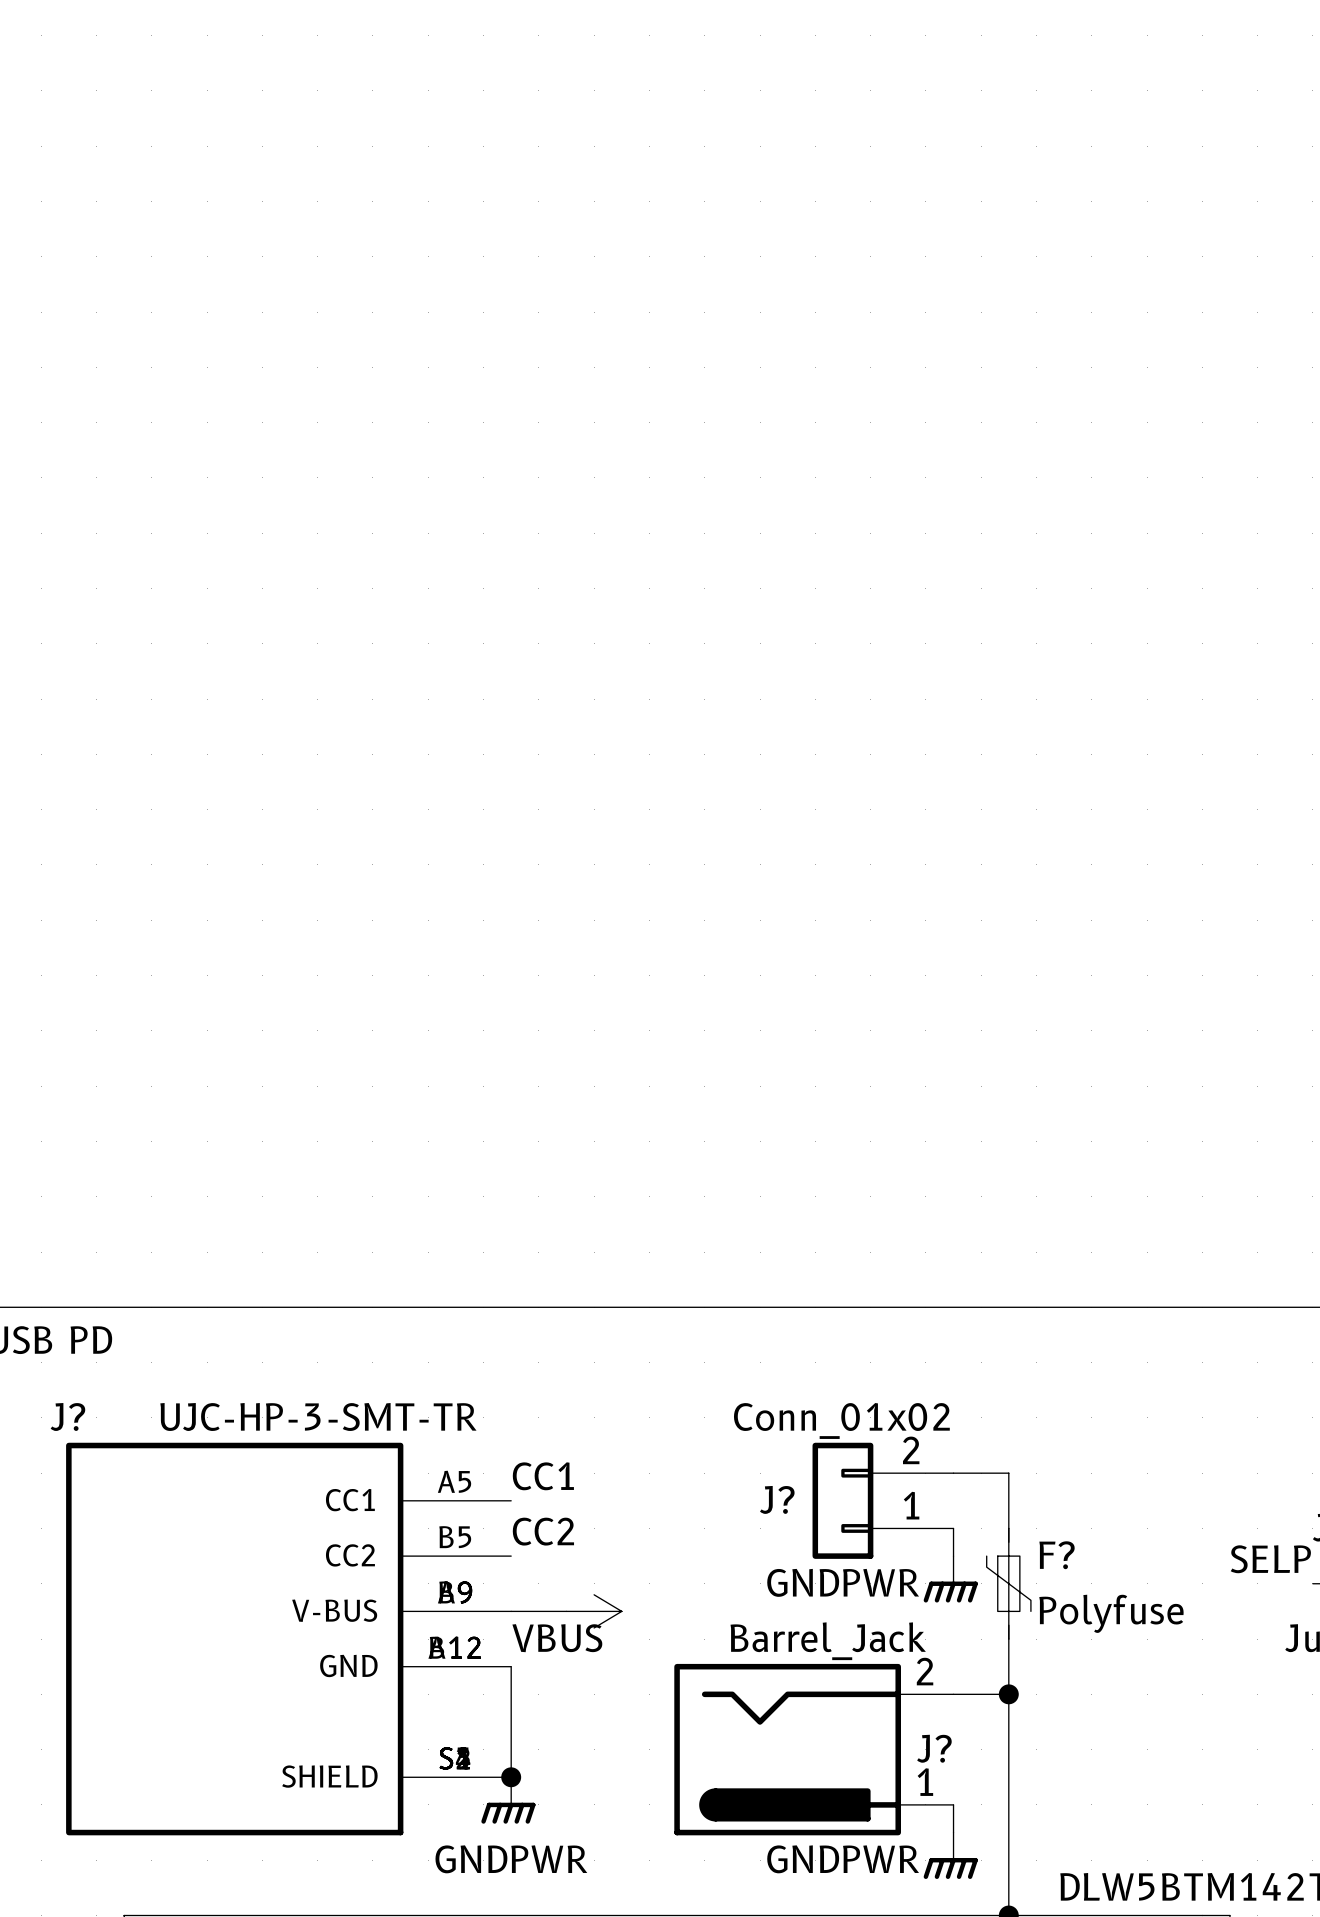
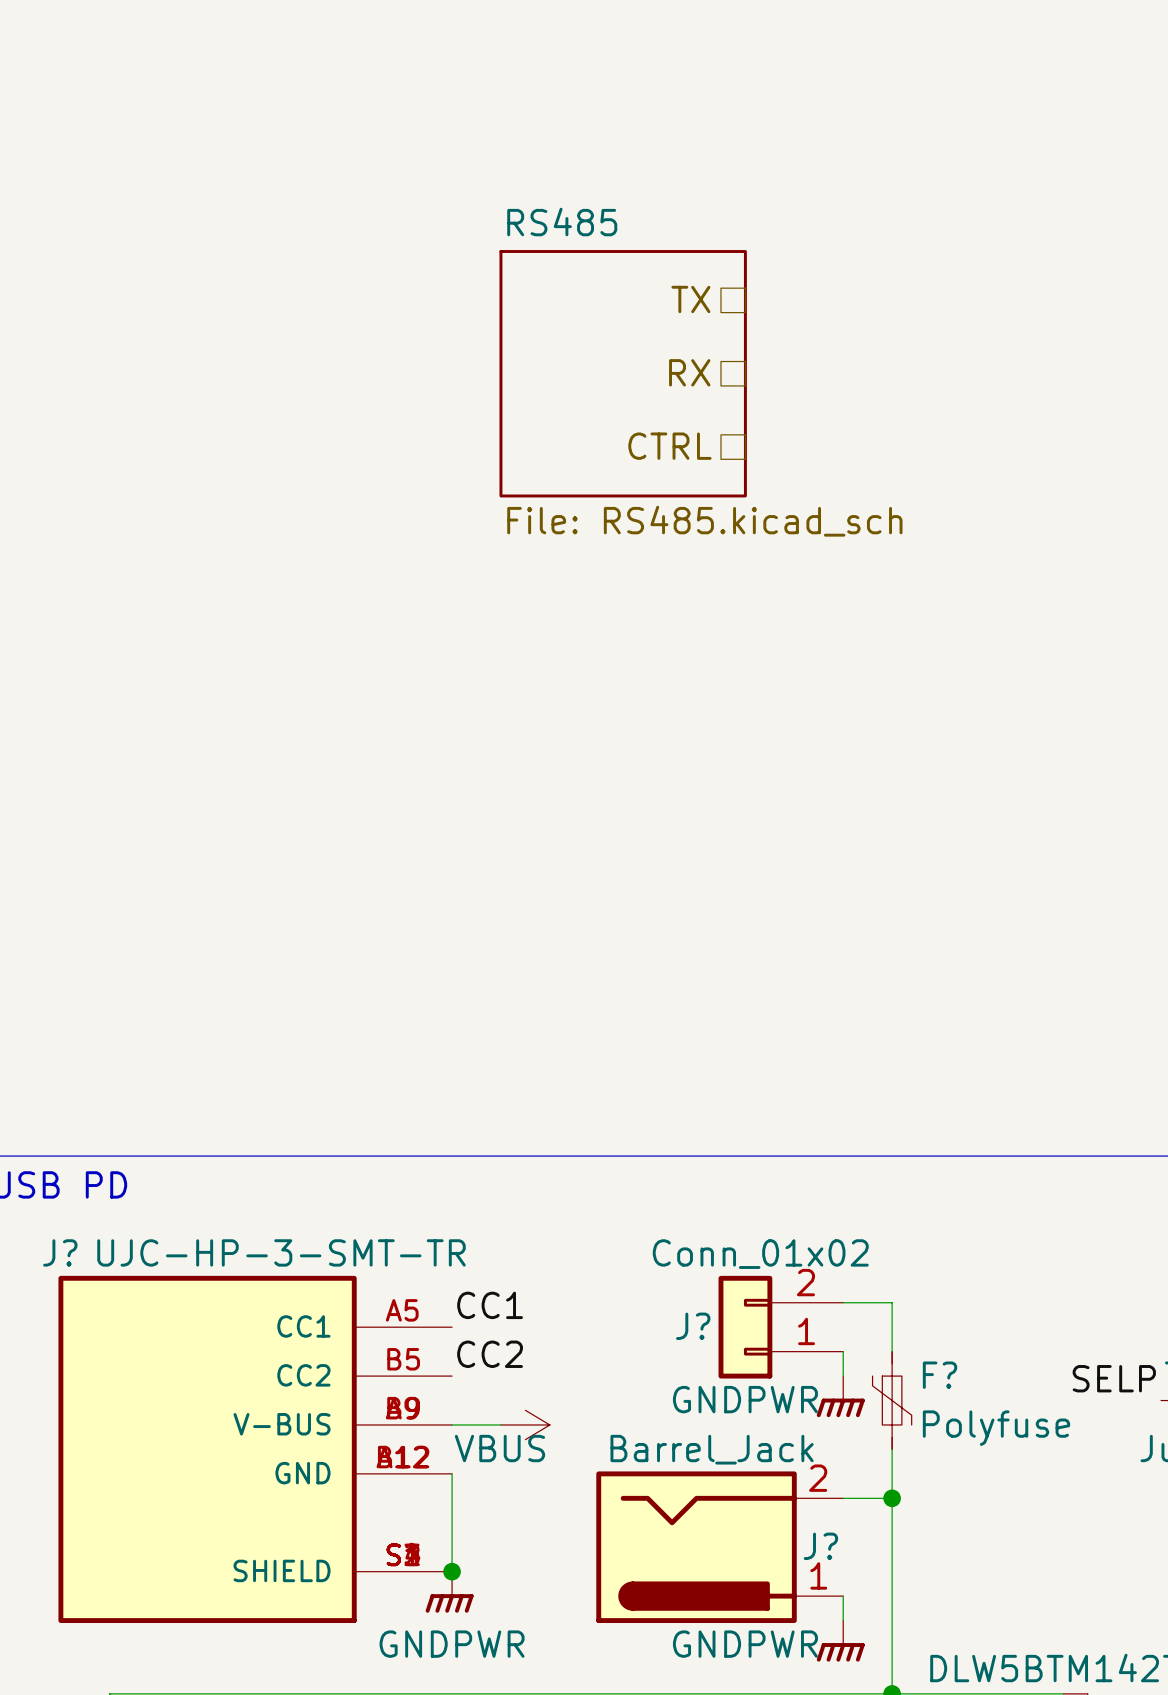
hierarchical label: none -> TX (690, 299)
hierarchical label: none -> RX (689, 372)
sheet RS485: none -> File: RS485.kicad_sch (623, 373)
hierarchical label: none -> CTRL (669, 446)

